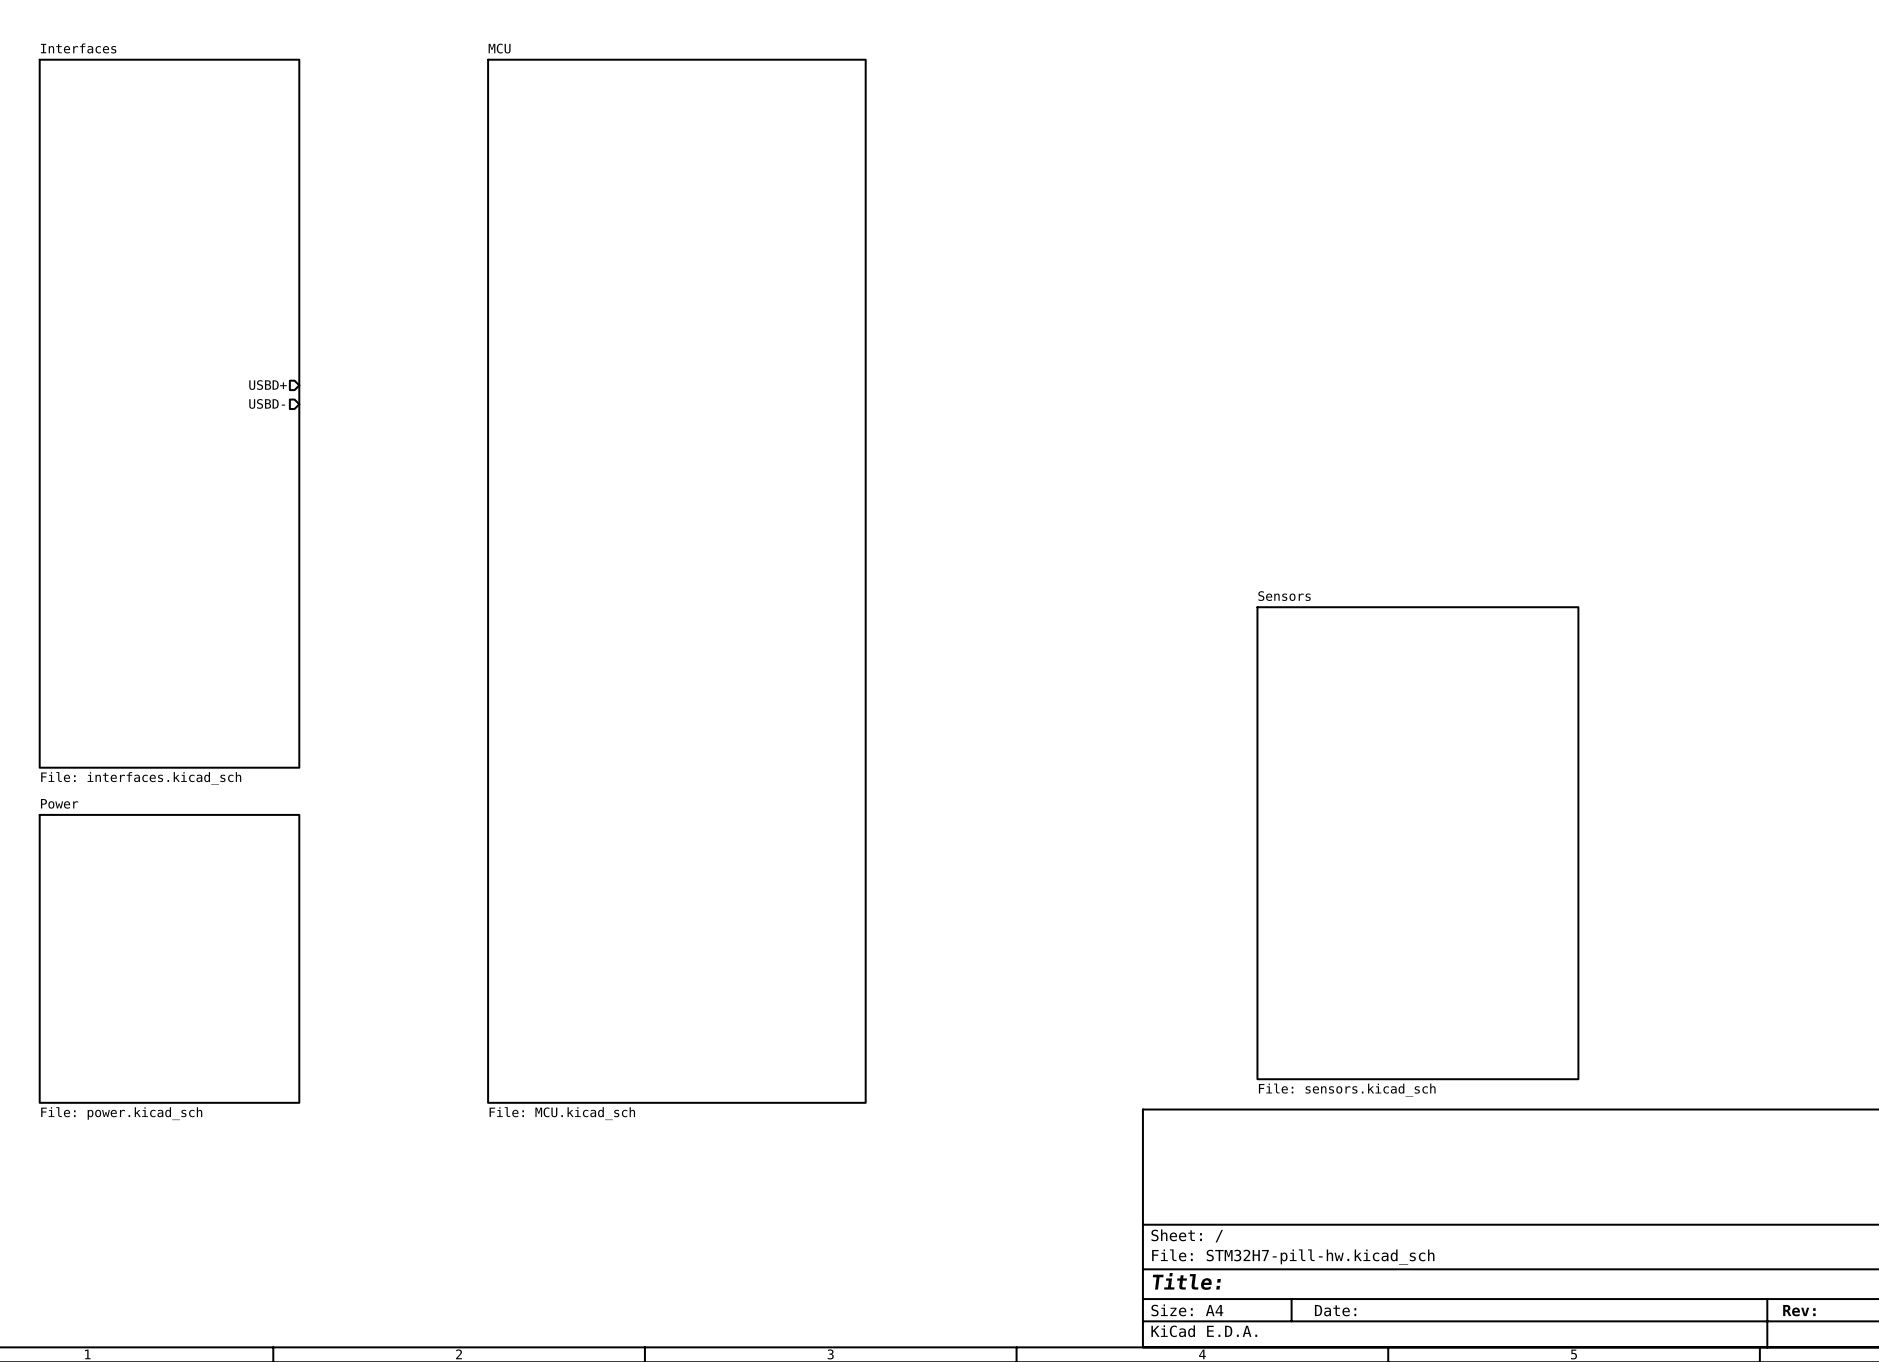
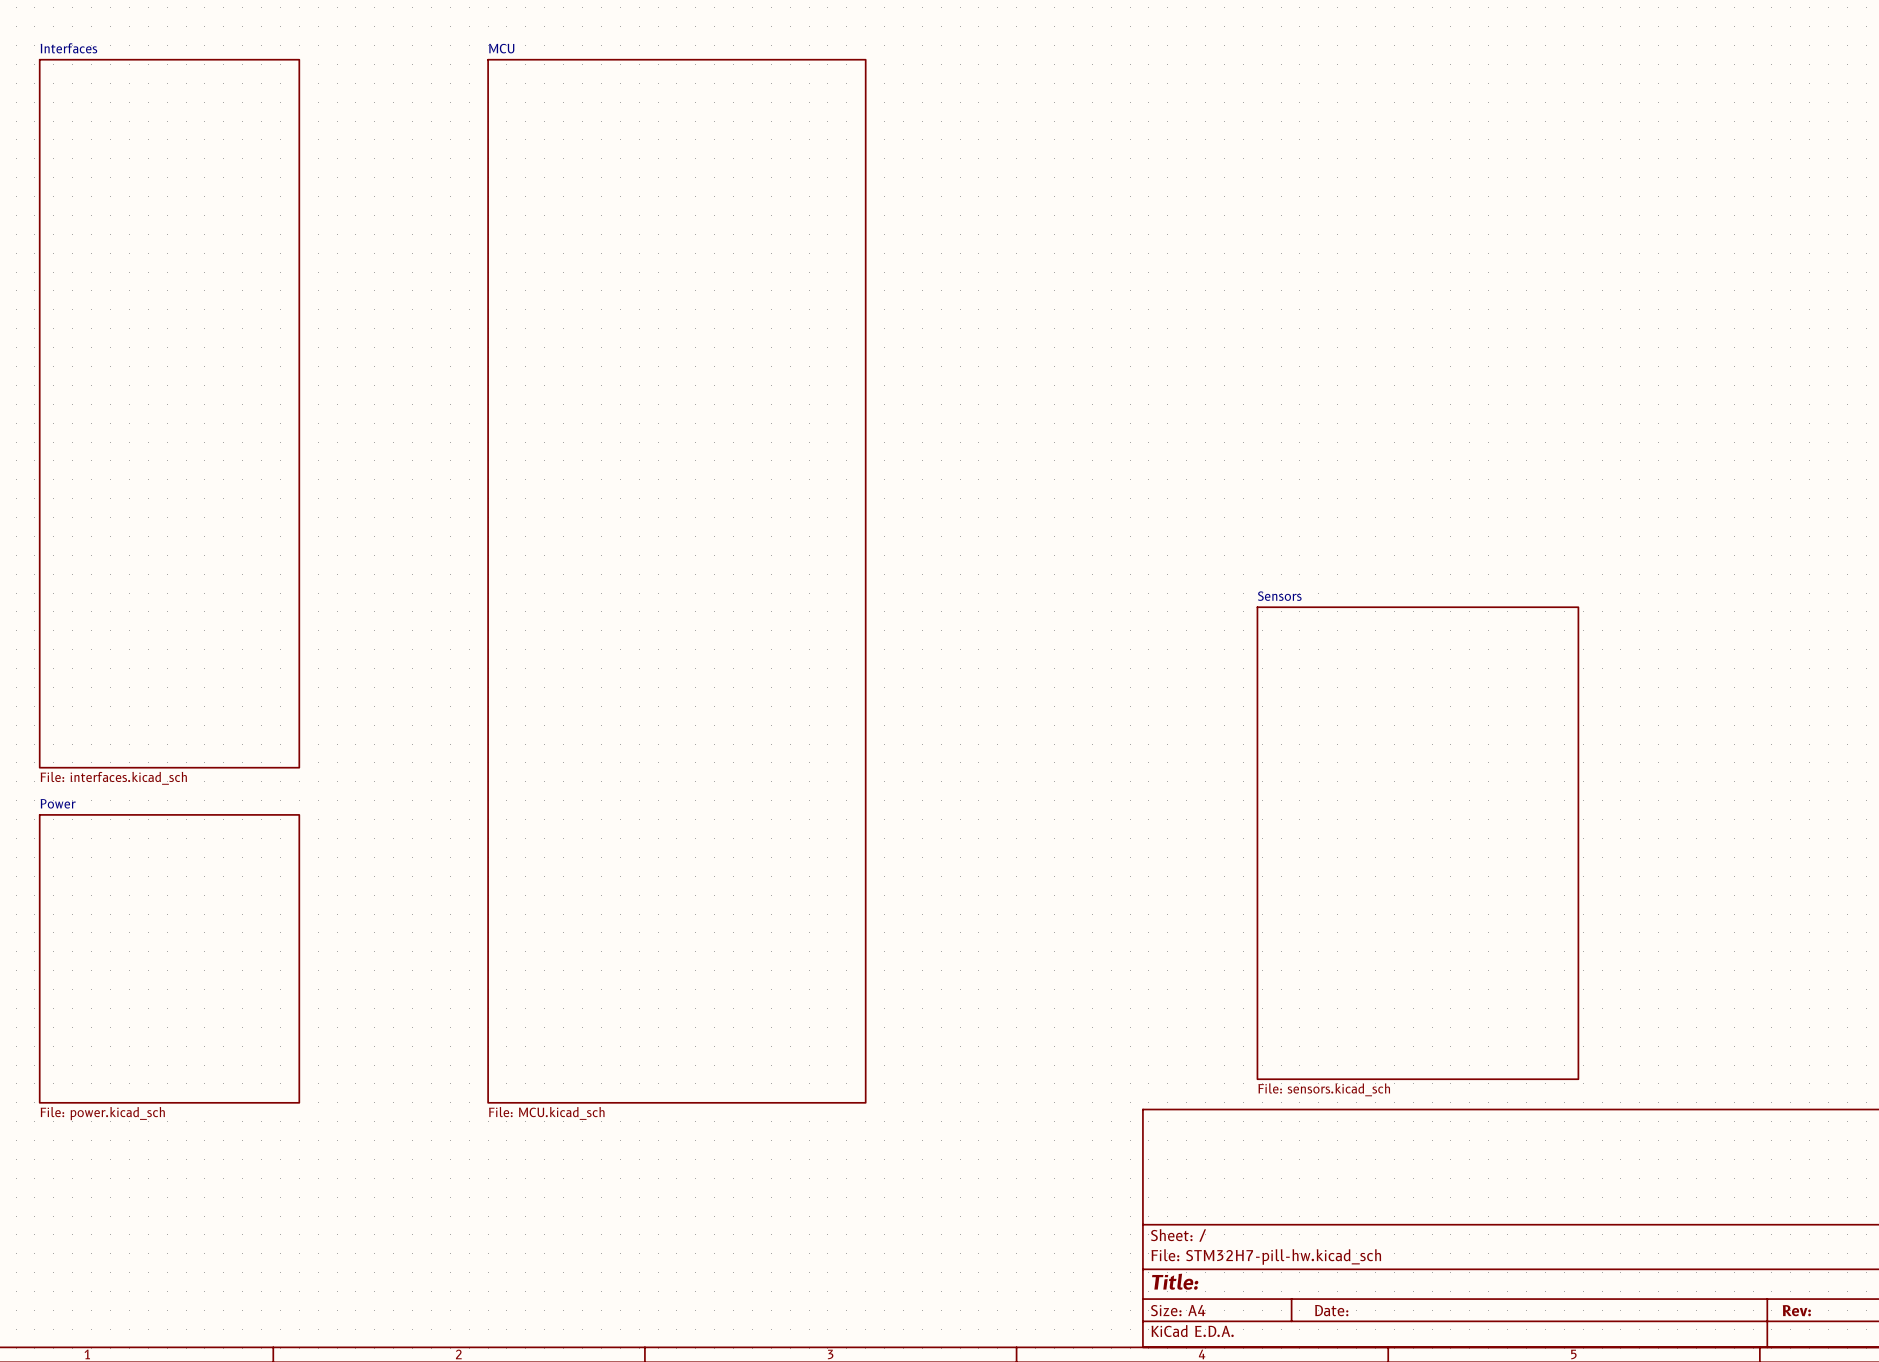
sheet pin: USBD+ (268, 385) -> none
sheet pin: USBD- (267, 403) -> none

